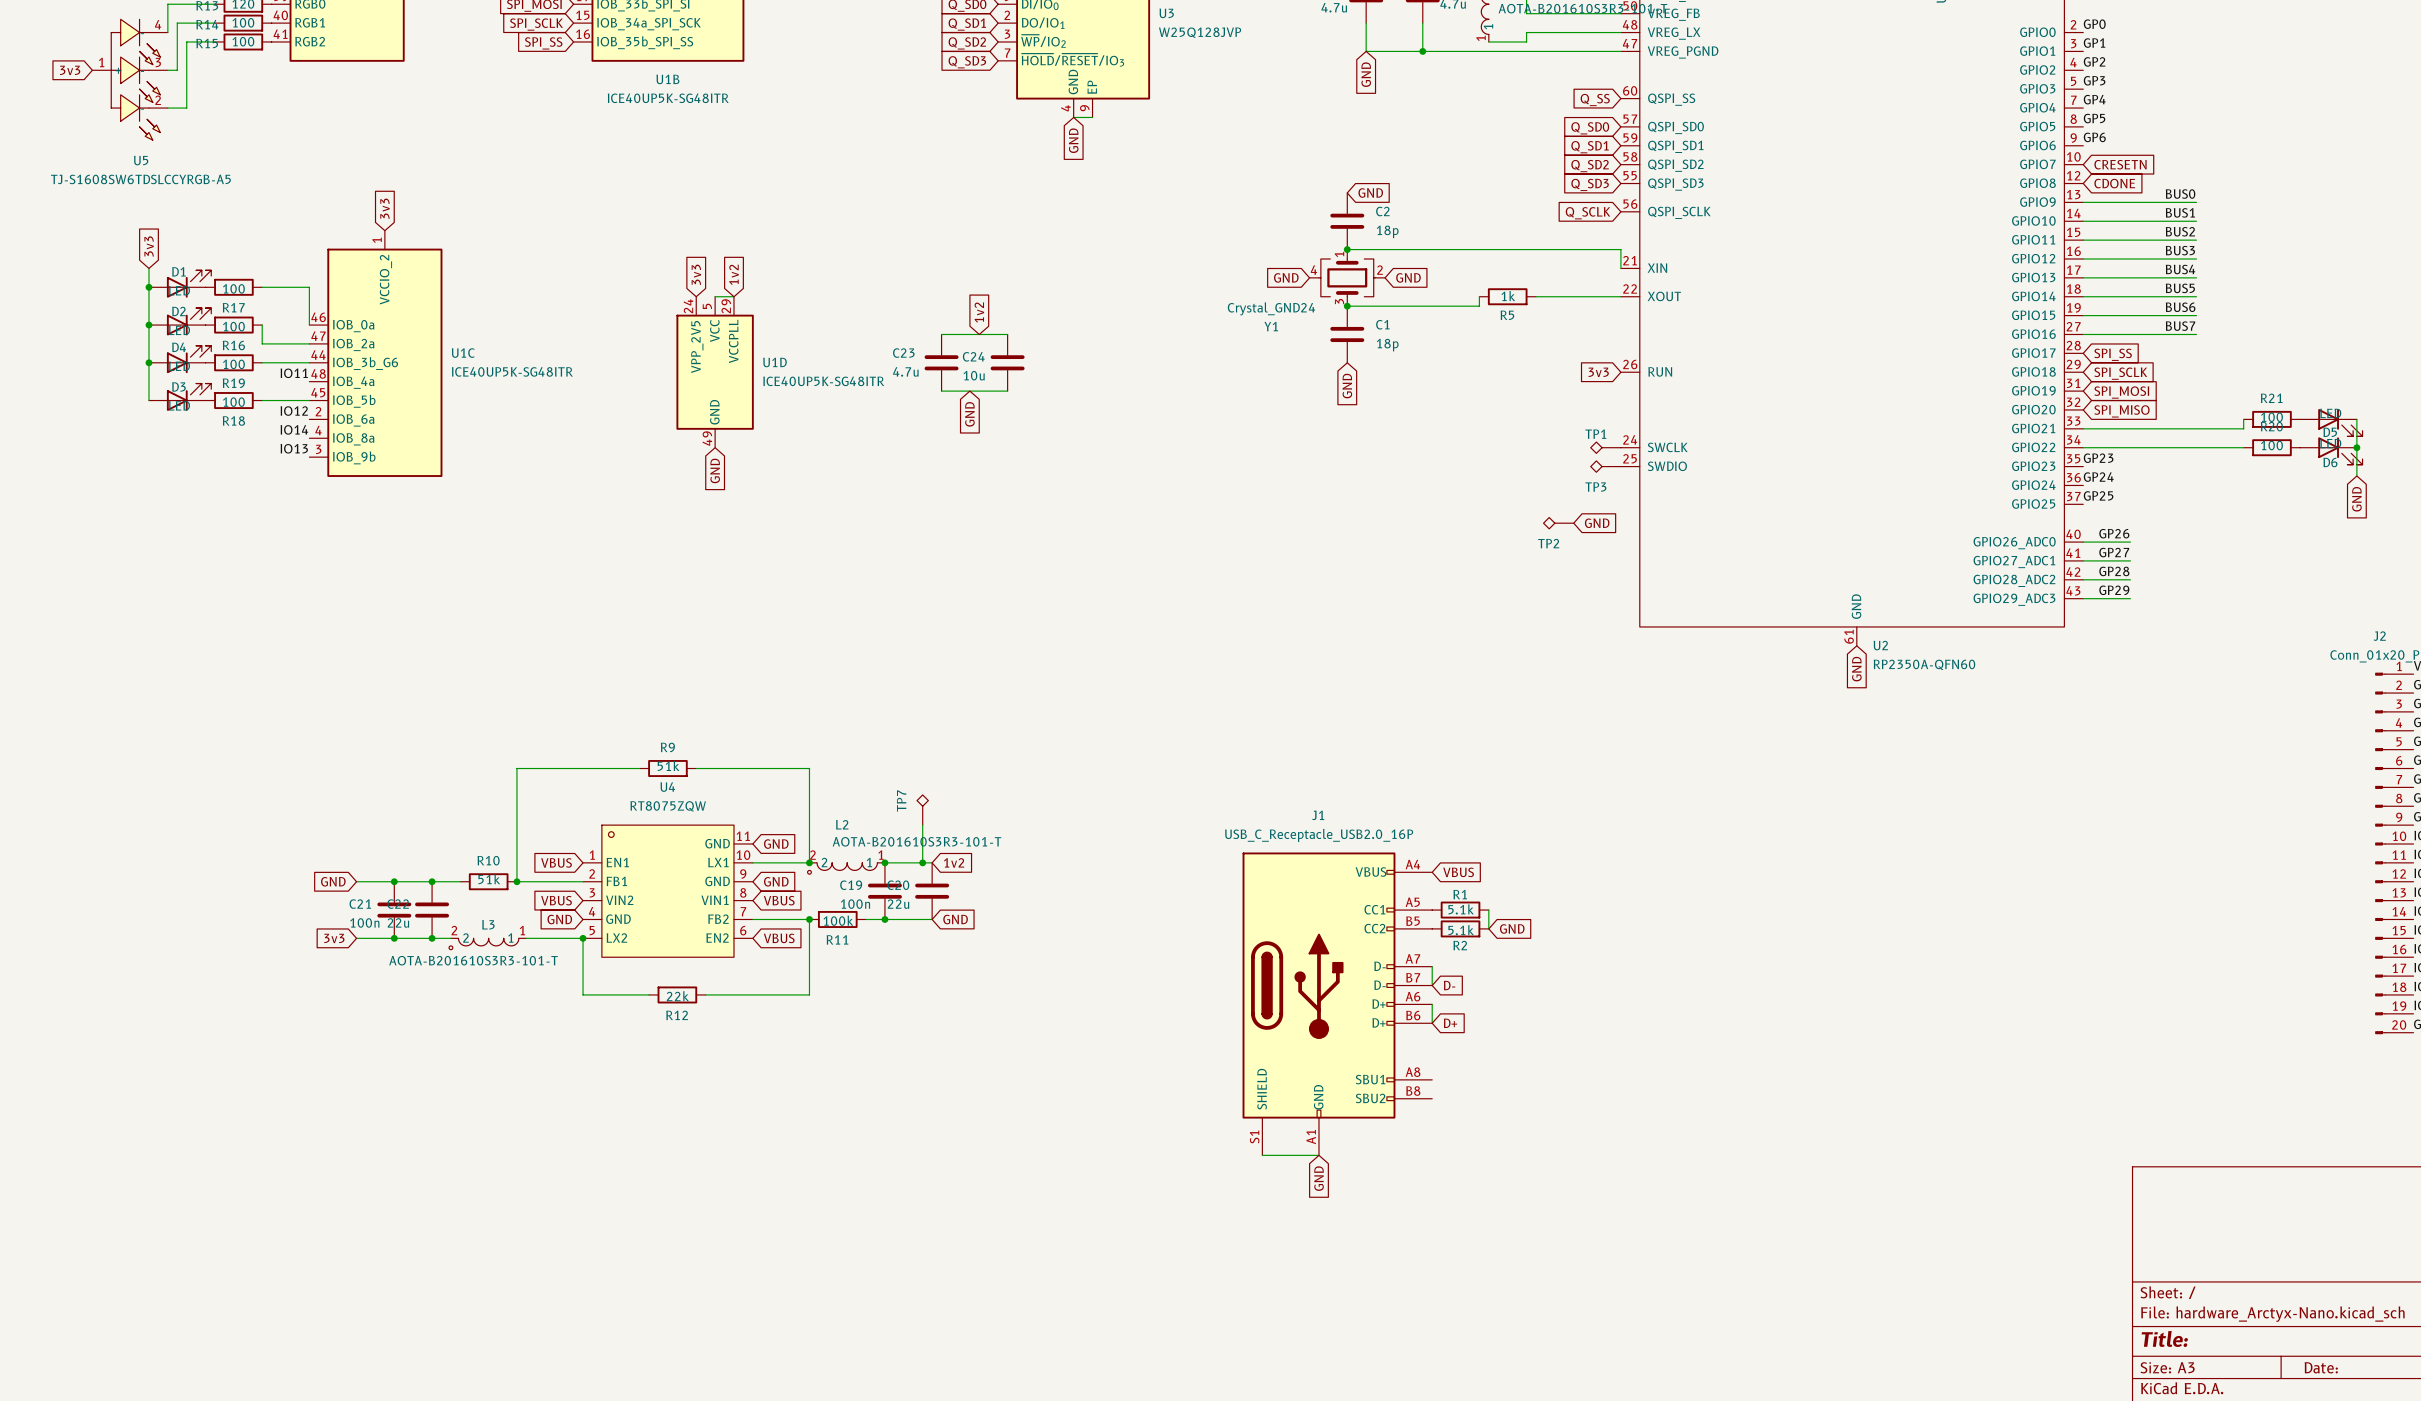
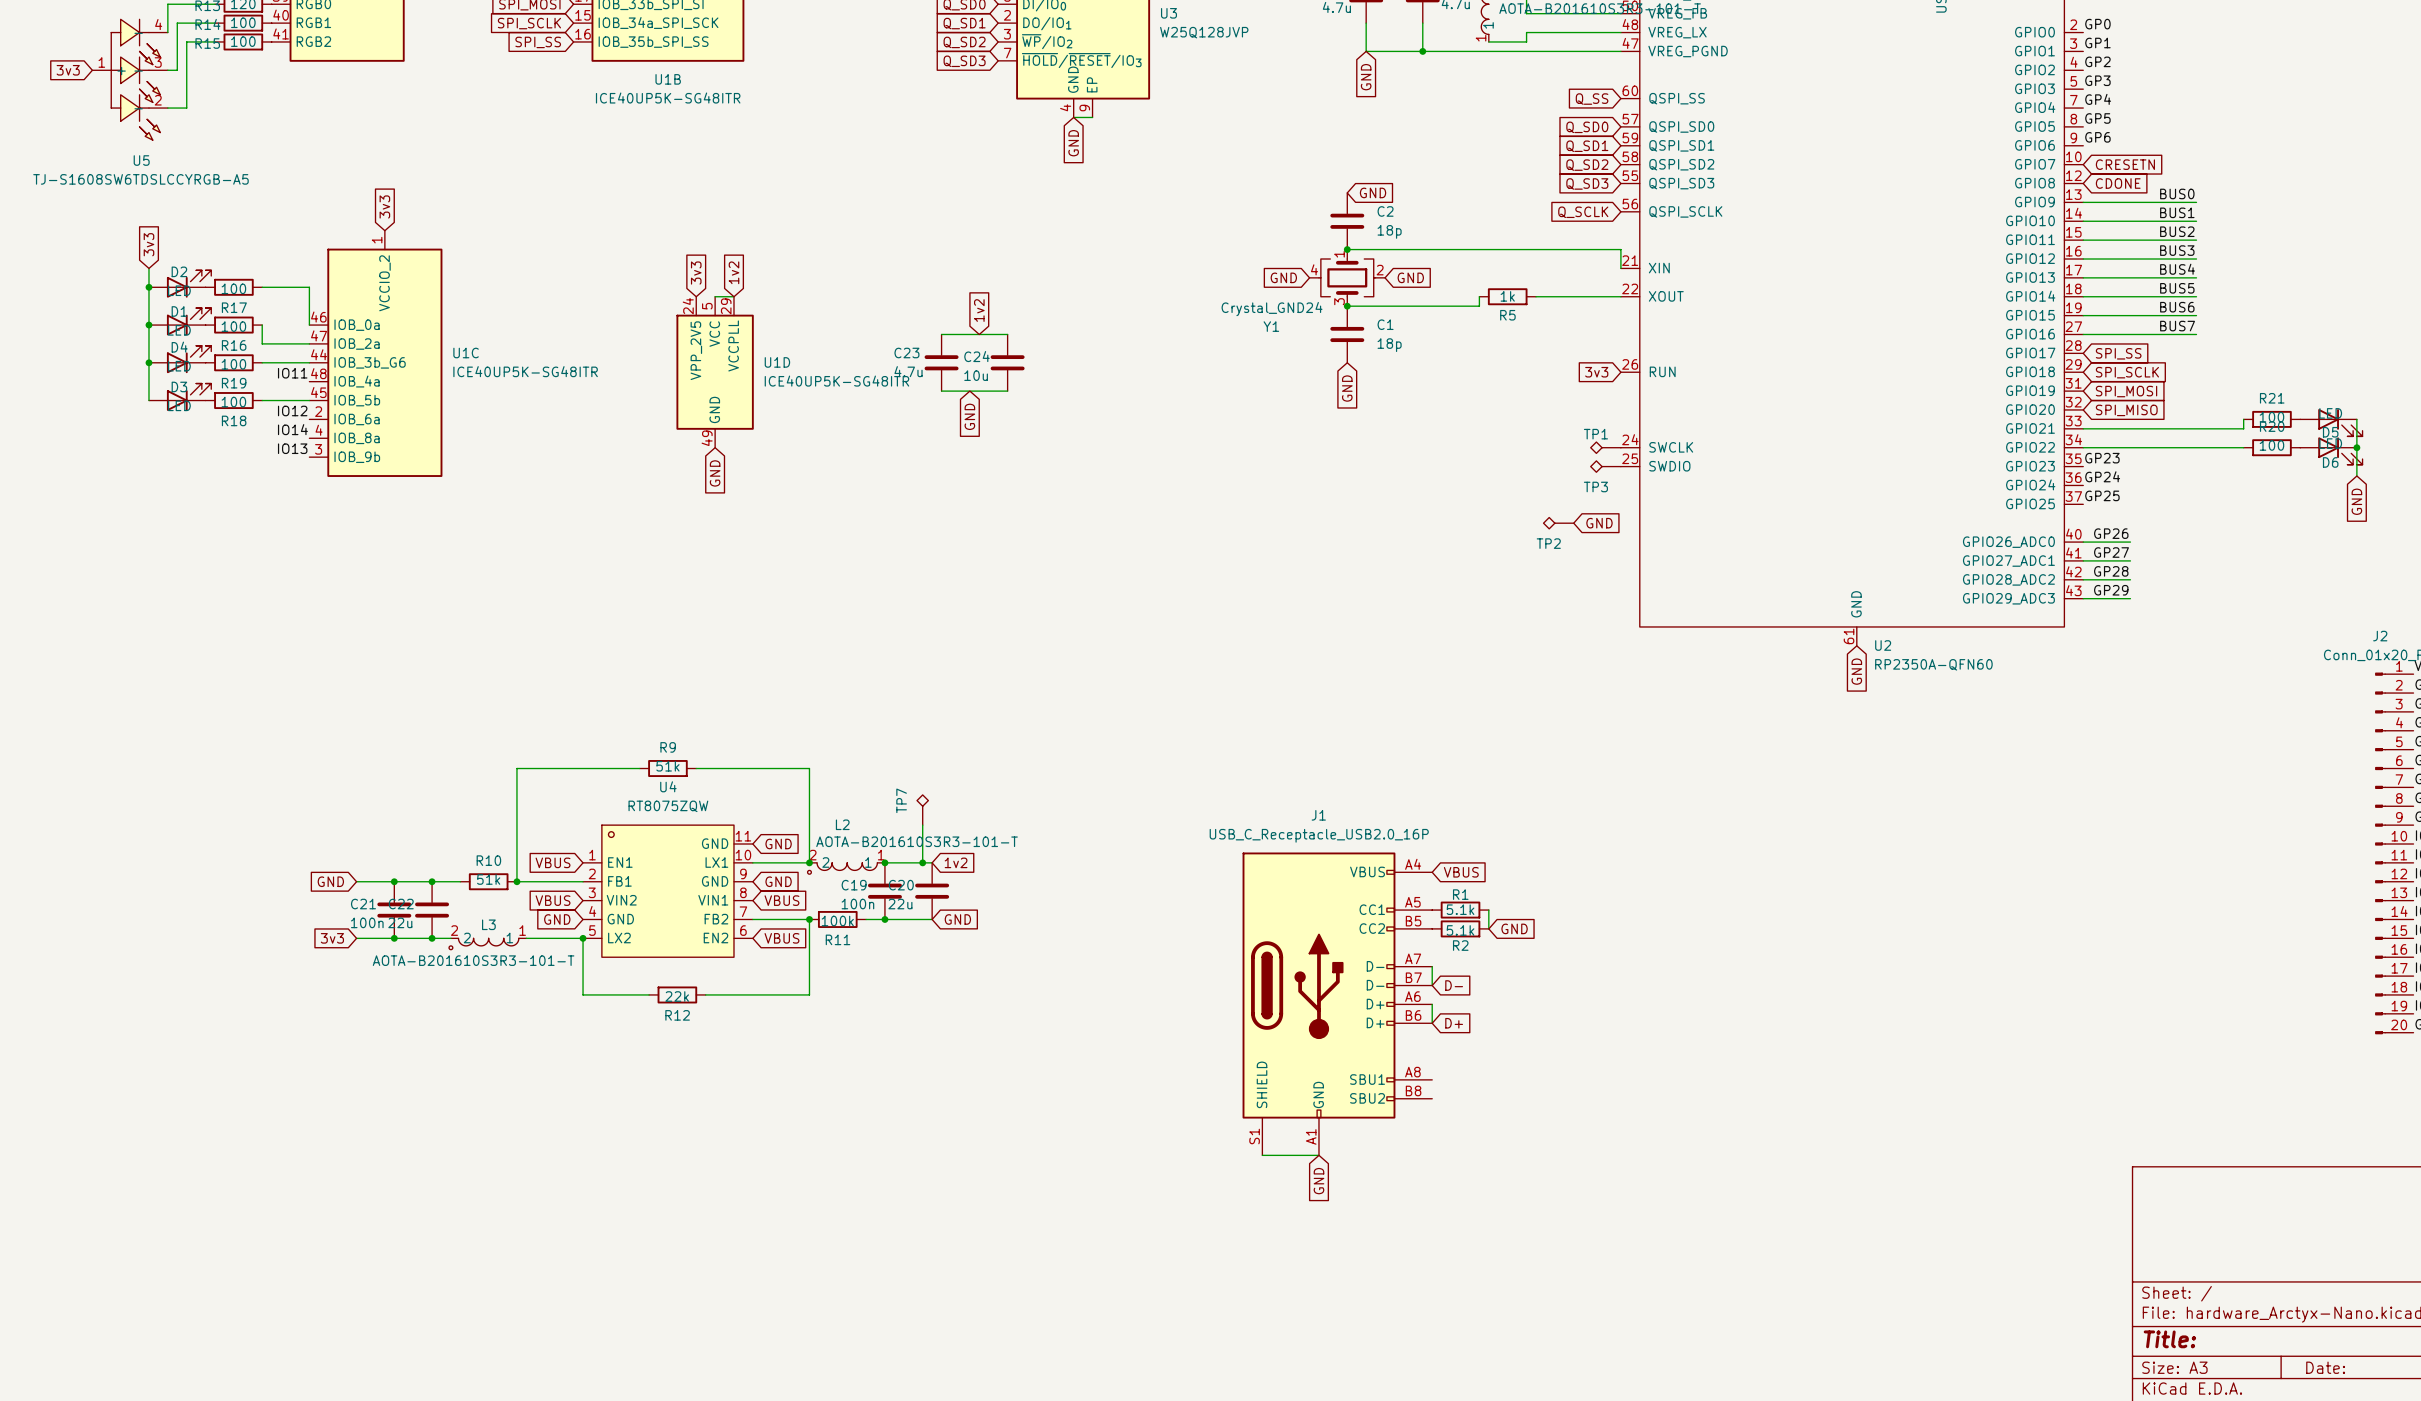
D1 name: D1 (178, 271) -> D2 (179, 271)
D2 name: D2 (178, 311) -> D1 (179, 311)

